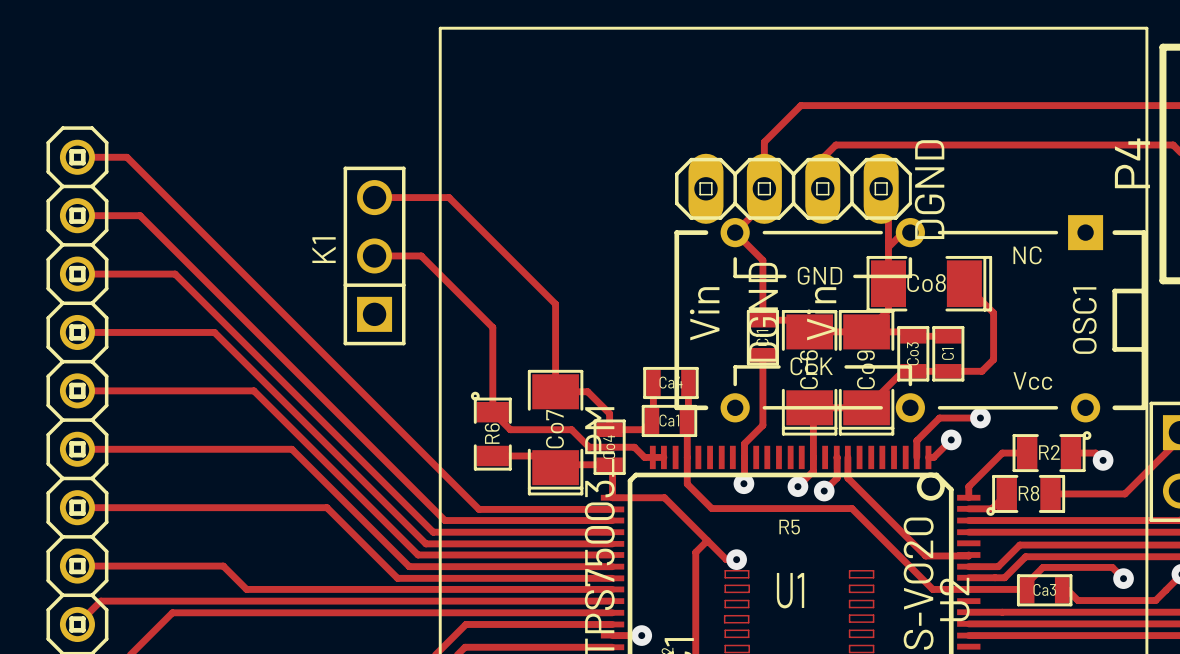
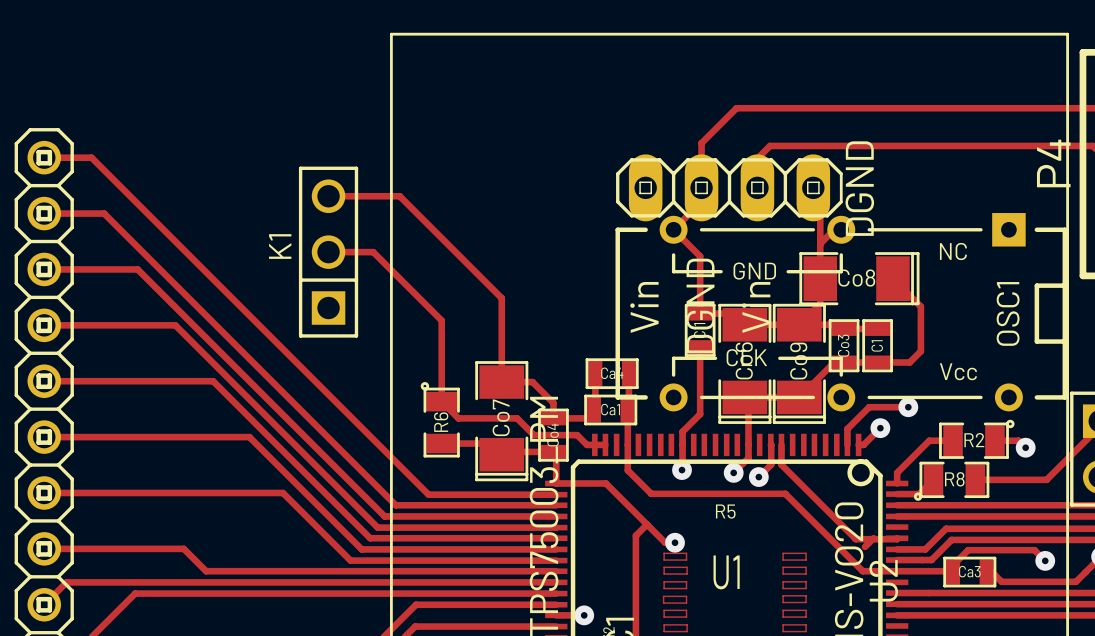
track: none -> (873, 538) (865, 546)

